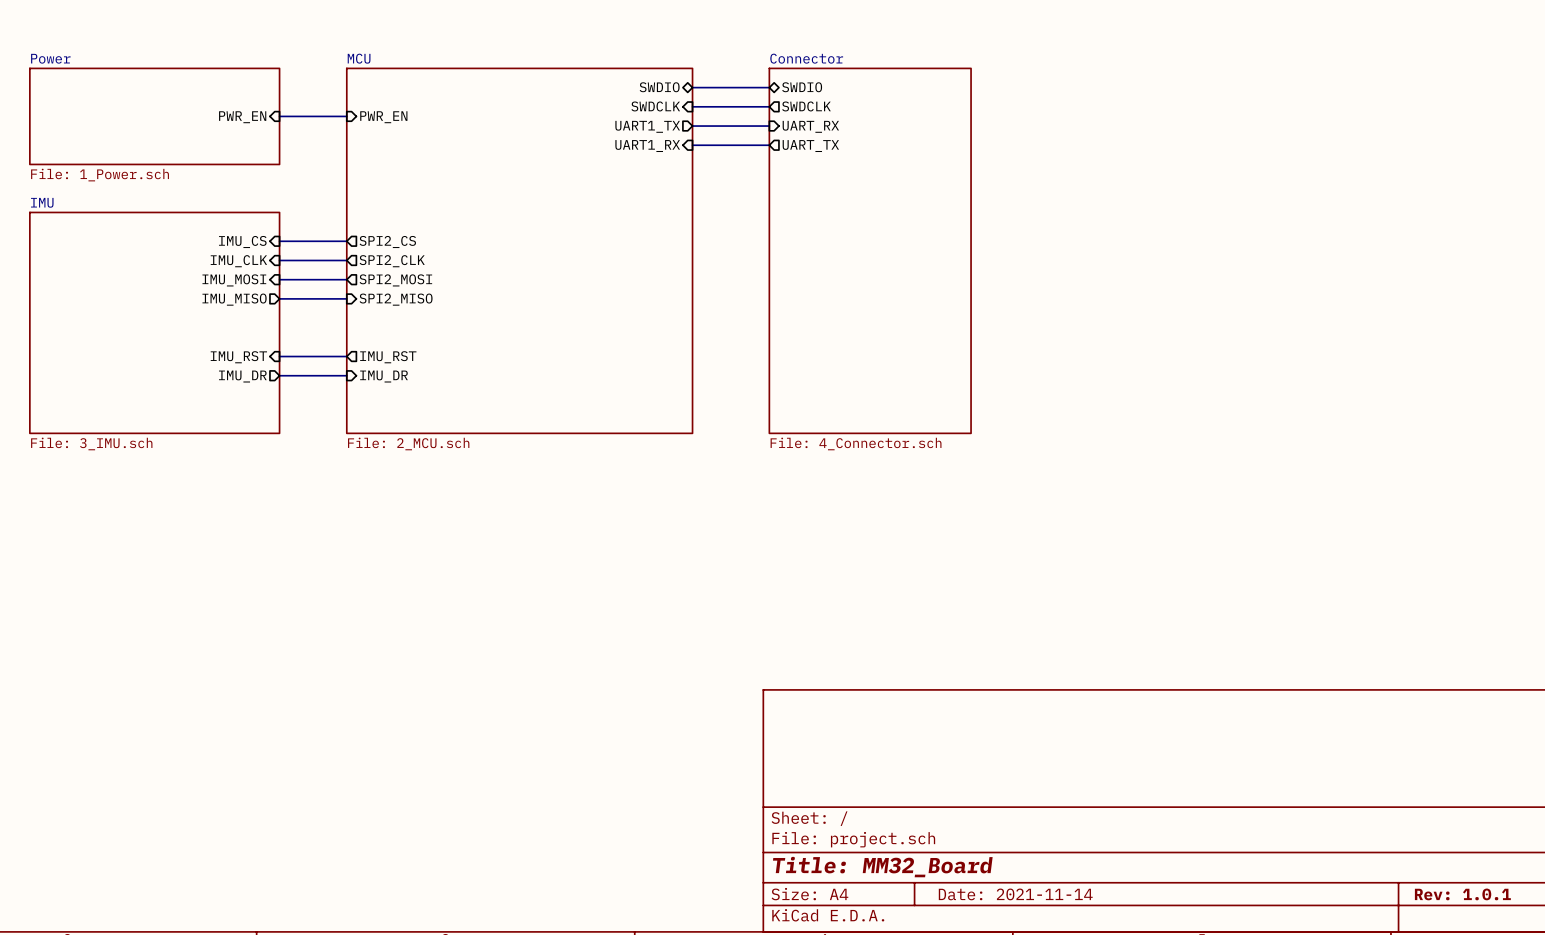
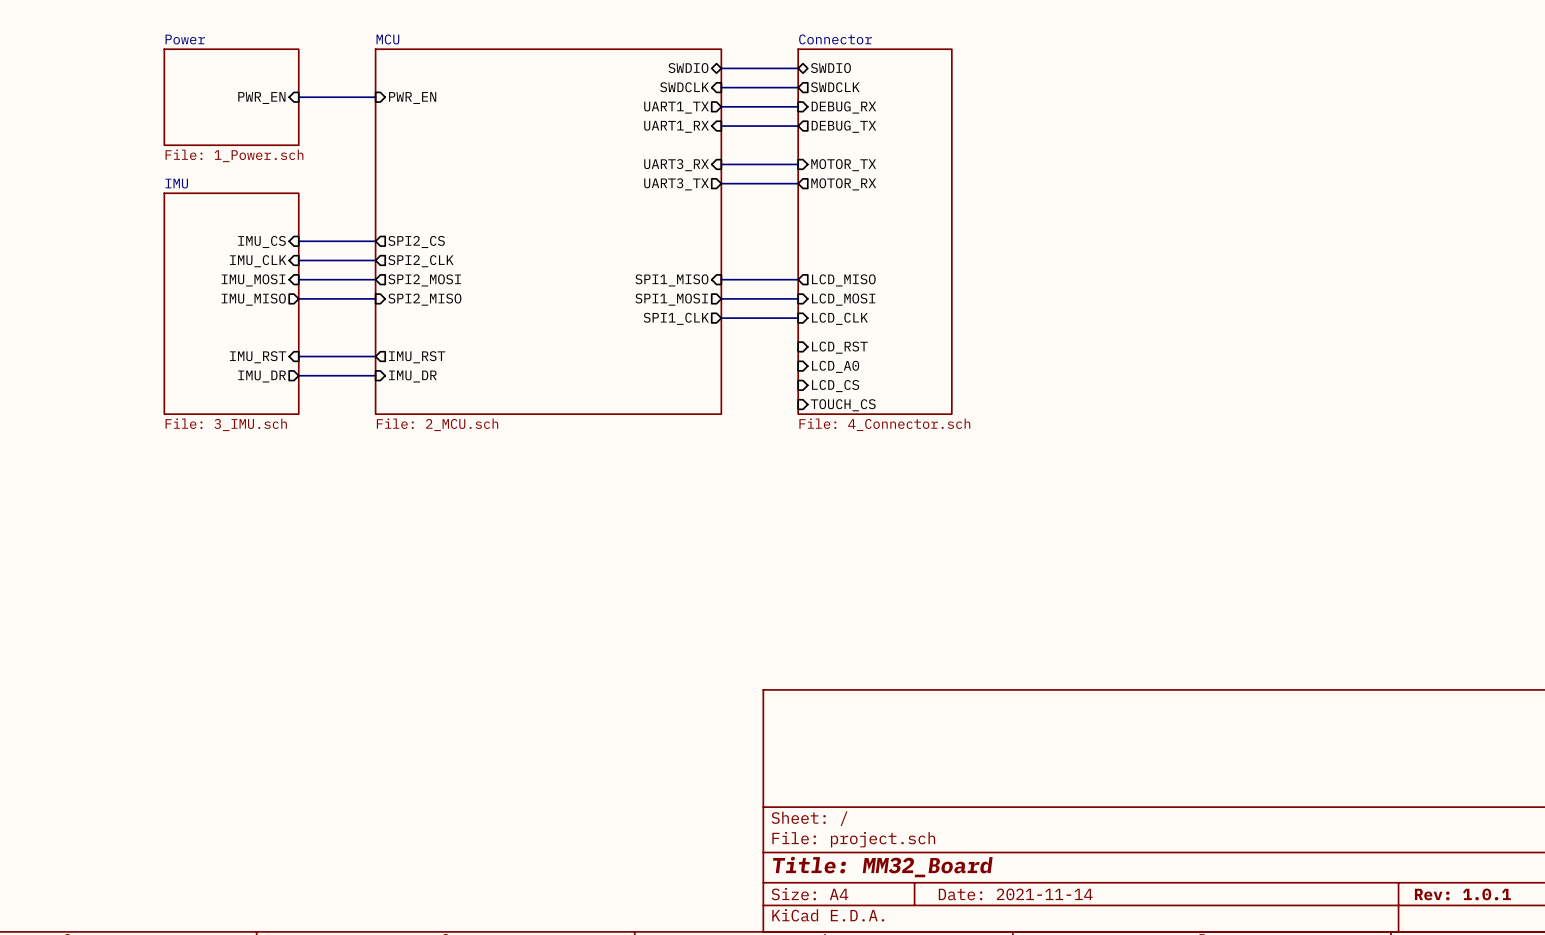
wire: none -> (721, 68) (798, 68)
sheet pin position: SWDIO (659, 87) -> SWDIO (688, 68)
wire: (692, 87) (721, 87) -> (769, 87) (798, 87)
sheet pin position: SWDIO (802, 87) -> SWDIO (830, 68)
sheet Power: none -> File: 1_Power.sch (231, 97)
wire: none -> (298, 97) (375, 97)
sheet pin position: SWDCLK (655, 106) -> SWDCLK (684, 87)
wire: (692, 106) (721, 106) -> (769, 106) (798, 106)
sheet pin position: SWDCLK (806, 106) -> SWDCLK (835, 87)
sheet pin: none -> DEBUG_RX (843, 107)
sheet Power: File: 1_Power.sch (154, 116) -> none
wire: (279, 116) (346, 116) -> none
sheet pin position: PWR_EN (242, 117) -> PWR_EN (261, 98)
sheet pin position: PWR_EN (383, 117) -> PWR_EN (412, 98)
sheet pin position: UART1_TX (647, 126) -> UART1_TX (676, 107)
wire: (692, 126) (721, 126) -> (769, 126) (798, 126)
sheet pin: UART_RX (810, 126) -> none
sheet pin: none -> DEBUG_TX (843, 126)
wire: (692, 145) (769, 145) -> (721, 164) (798, 164)
sheet pin position: UART1_RX (647, 146) -> UART1_RX (676, 126)
sheet pin: UART_TX (810, 146) -> none
sheet pin: none -> UART3_RX (676, 165)
sheet pin: none -> MOTOR_TX (843, 165)
wire: none -> (721, 183) (798, 183)
sheet pin: none -> UART3_TX (676, 184)
sheet pin: none -> MOTOR_RX (843, 184)
sheet Connector: none -> File: 4_Connector.sch (875, 231)
wire: (279, 241) (298, 241) -> none
wire: none -> (346, 241) (375, 241)
sheet pin position: IMU_CS (242, 242) -> IMU_CS (261, 242)
sheet pin position: SPI2_CS (387, 242) -> SPI2_CS (416, 242)
sheet MCU position: (519, 250) -> (548, 231)
sheet Connector: File: 4_Connector.sch (870, 250) -> none
wire: (279, 260) (298, 260) -> none
wire: none -> (346, 260) (375, 260)
sheet pin position: IMU_CLK (238, 261) -> IMU_CLK (258, 261)
sheet pin position: SPI2_CLK (392, 261) -> SPI2_CLK (420, 261)
wire: (279, 279) (298, 279) -> none
wire: none -> (346, 279) (375, 279)
wire: none -> (721, 279) (798, 279)
sheet pin position: IMU_MOSI (234, 280) -> IMU_MOSI (253, 280)
sheet pin position: SPI2_MOSI (395, 280) -> SPI2_MOSI (424, 280)
sheet pin: none -> SPI1_MISO (671, 280)
sheet pin: none -> LCD_MISO (843, 280)
wire: (279, 298) (298, 298) -> none
wire: none -> (346, 298) (375, 298)
wire: none -> (721, 298) (798, 298)
sheet pin position: IMU_MISO (234, 299) -> IMU_MISO (253, 299)
sheet pin position: SPI2_MISO (396, 299) -> SPI2_MISO (424, 299)
sheet pin: none -> SPI1_MOSI (671, 299)
sheet pin: none -> LCD_MOSI (843, 299)
sheet IMU: none -> File: 3_IMU.sch (231, 303)
sheet pin: none -> SPI1_CLK (676, 318)
wire: none -> (721, 318) (798, 318)
sheet pin: none -> LCD_CLK (839, 318)
sheet IMU: File: 3_IMU.sch (154, 322) -> none
sheet pin: none -> LCD_RST (839, 347)
wire: (279, 356) (298, 356) -> none
wire: none -> (346, 356) (375, 356)
sheet pin position: IMU_RST (238, 357) -> IMU_RST (258, 357)
sheet pin position: IMU_RST (388, 357) -> IMU_RST (417, 357)
sheet pin: none -> LCD_A0 (835, 366)
wire: (279, 375) (298, 375) -> none
wire: none -> (346, 375) (375, 375)
sheet pin position: IMU_DR (242, 376) -> IMU_DR (262, 376)
sheet pin position: IMU_DR (383, 376) -> IMU_DR (412, 376)
sheet pin: none -> LCD_CS (835, 386)
sheet pin: none -> TOUCH_CS (843, 405)

